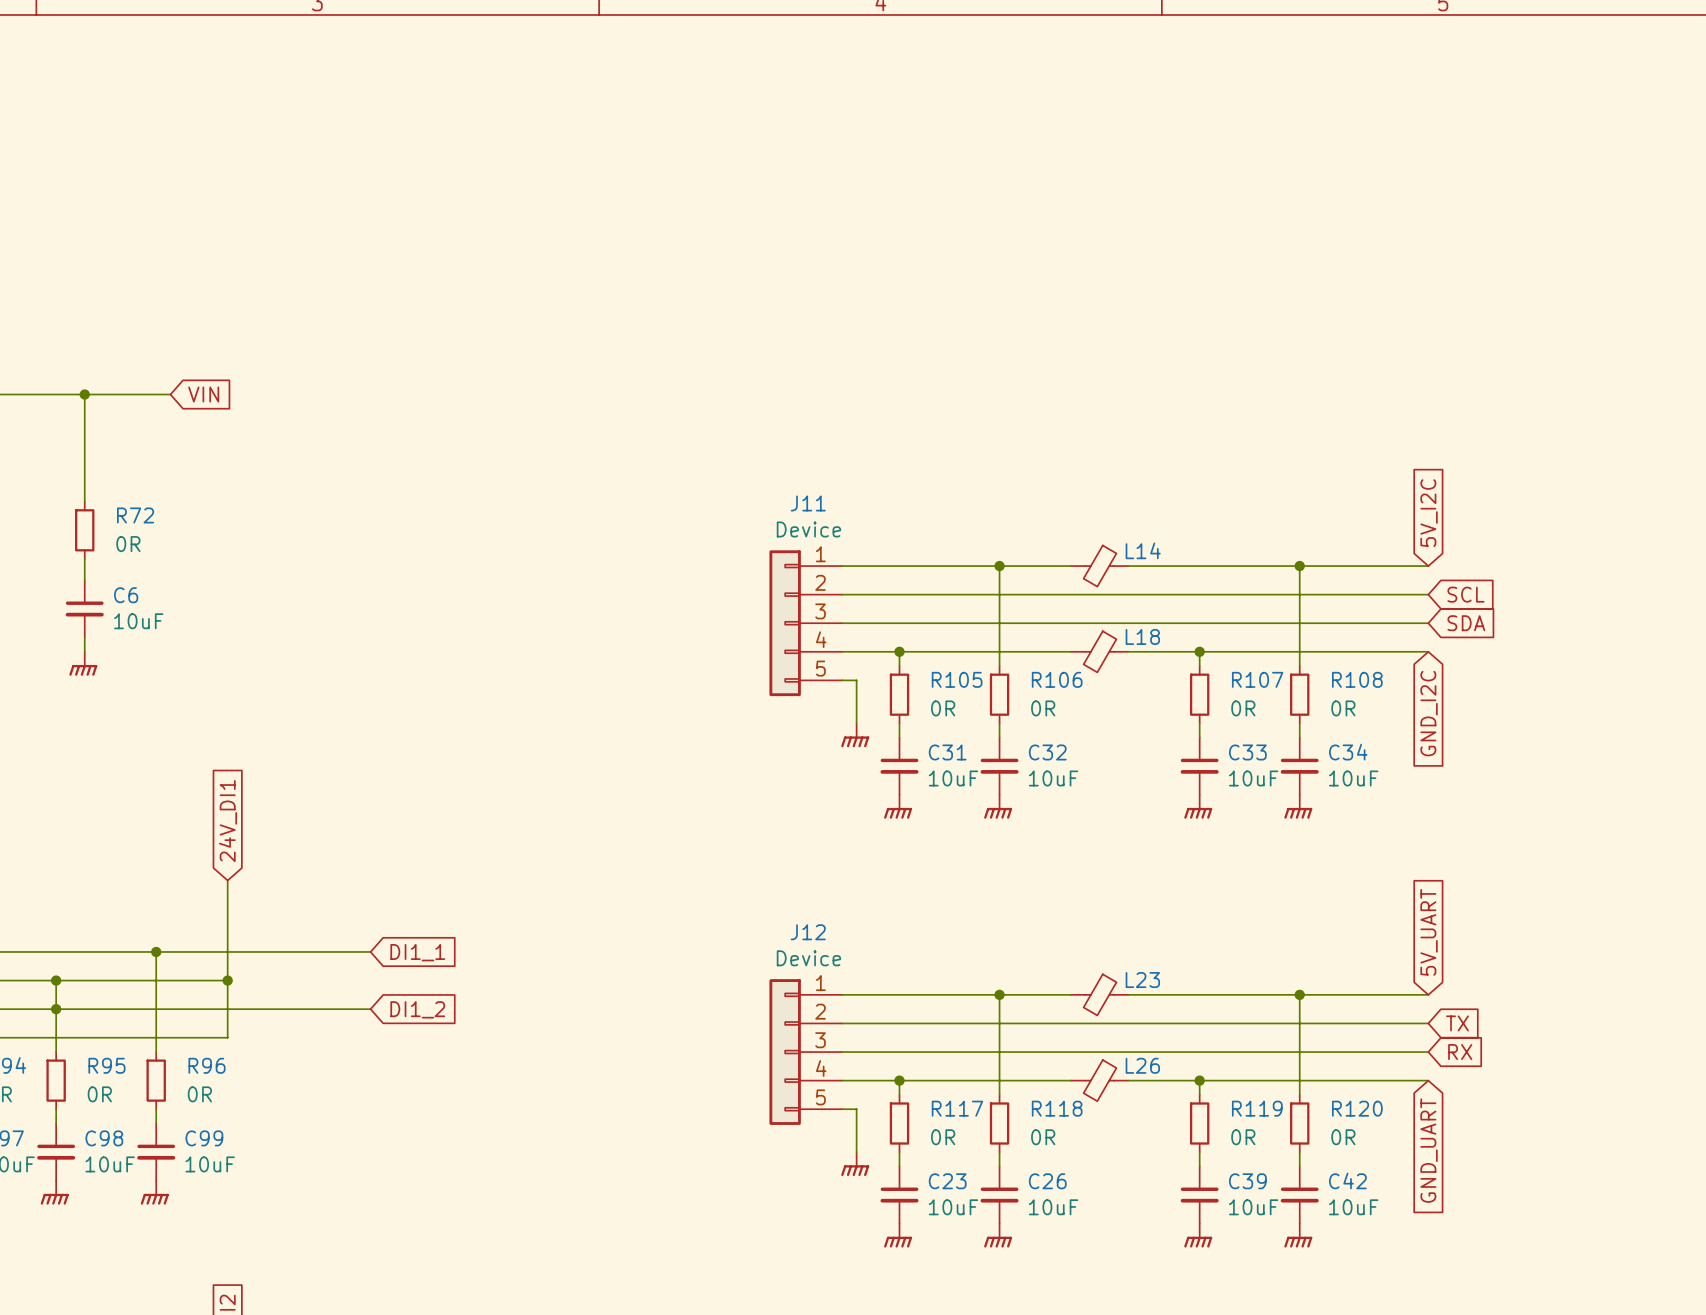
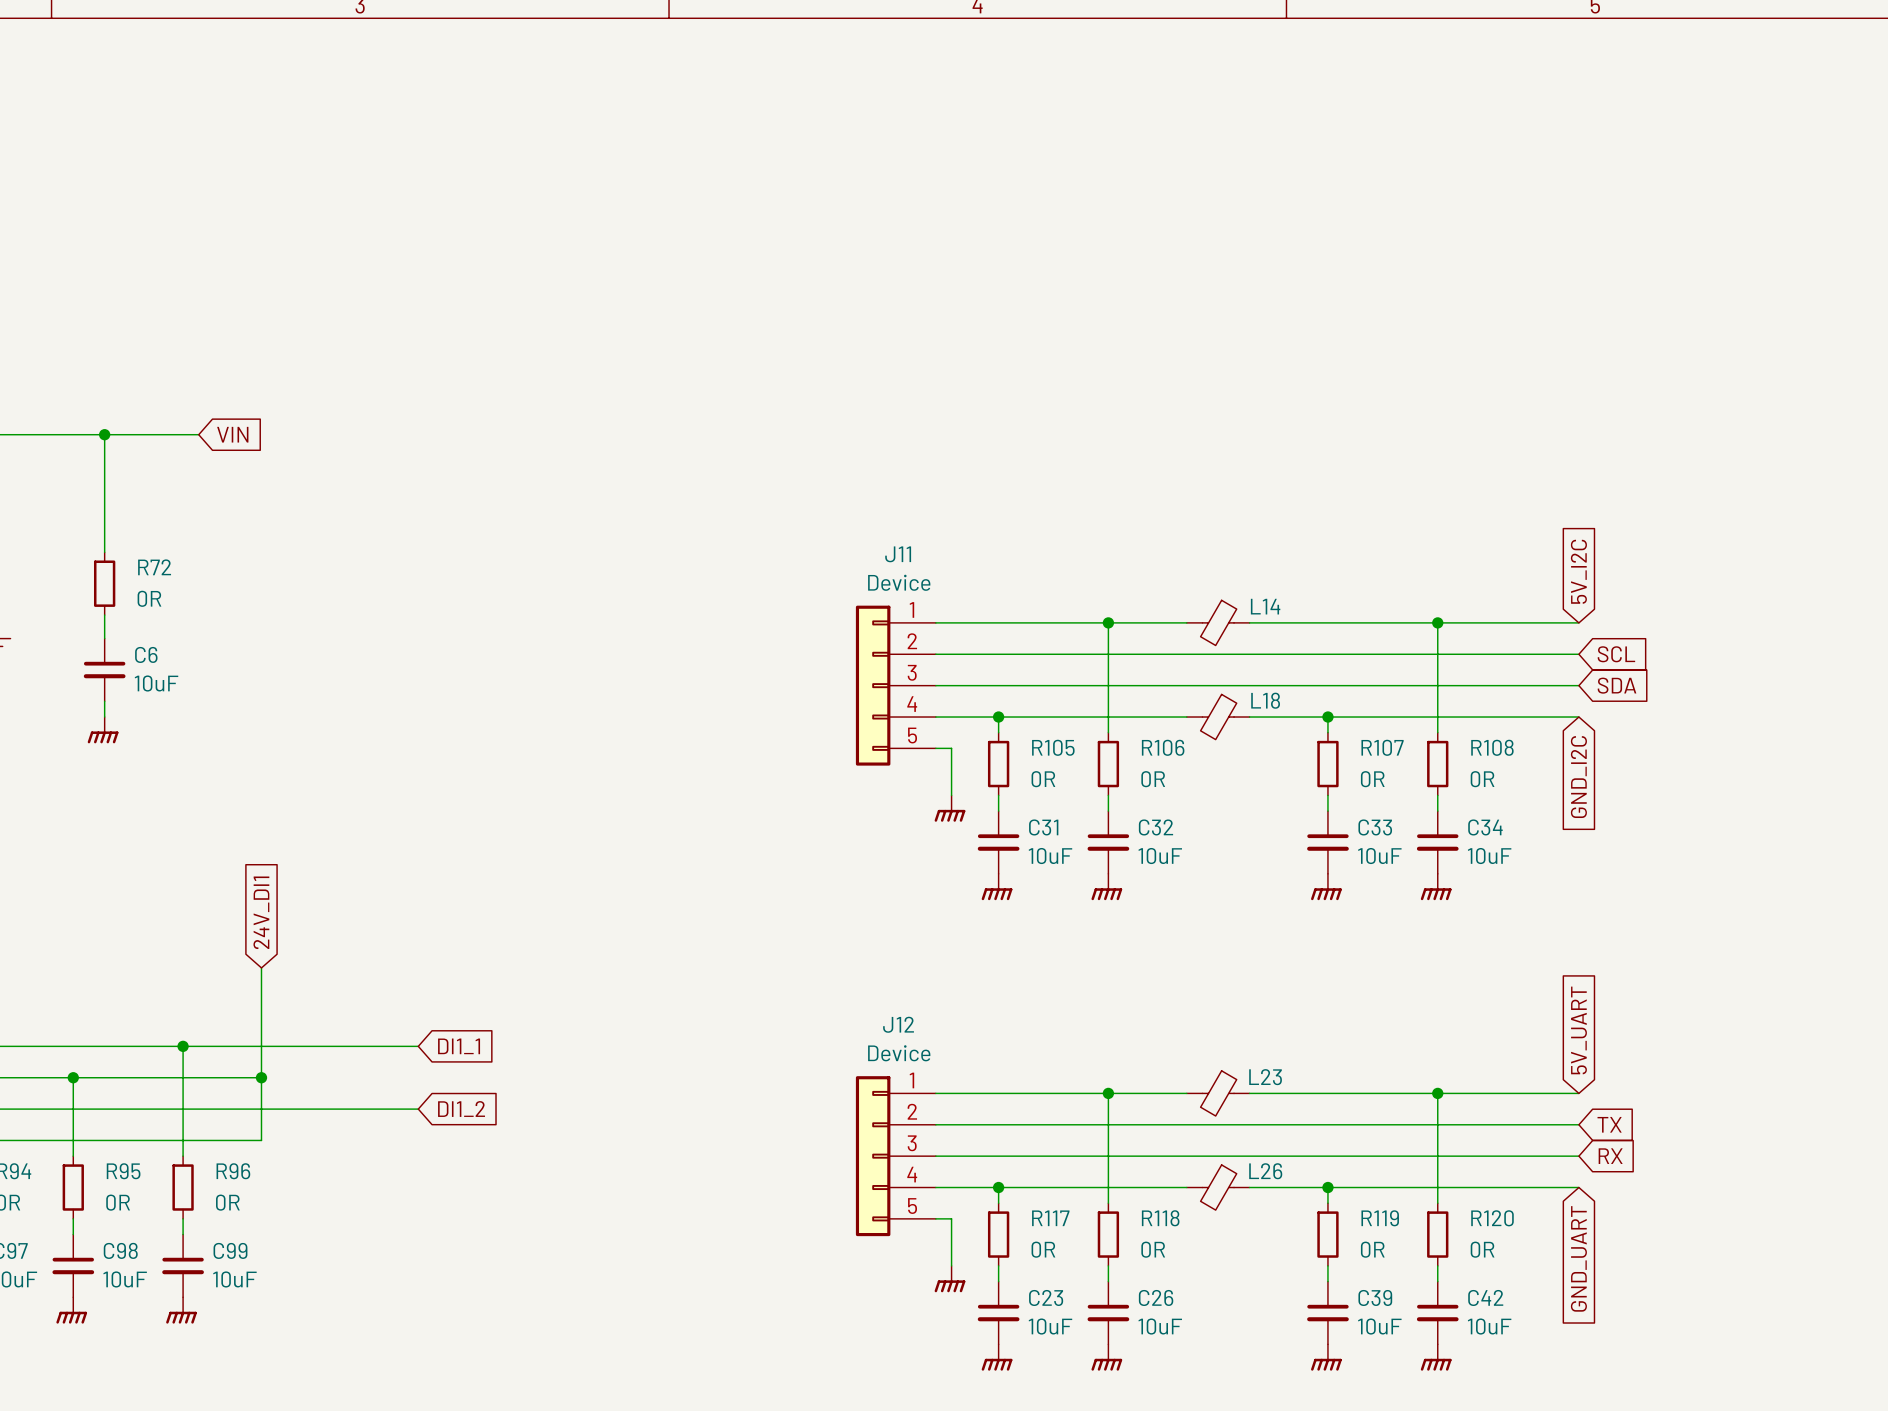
junction: (56, 1009) -> none

